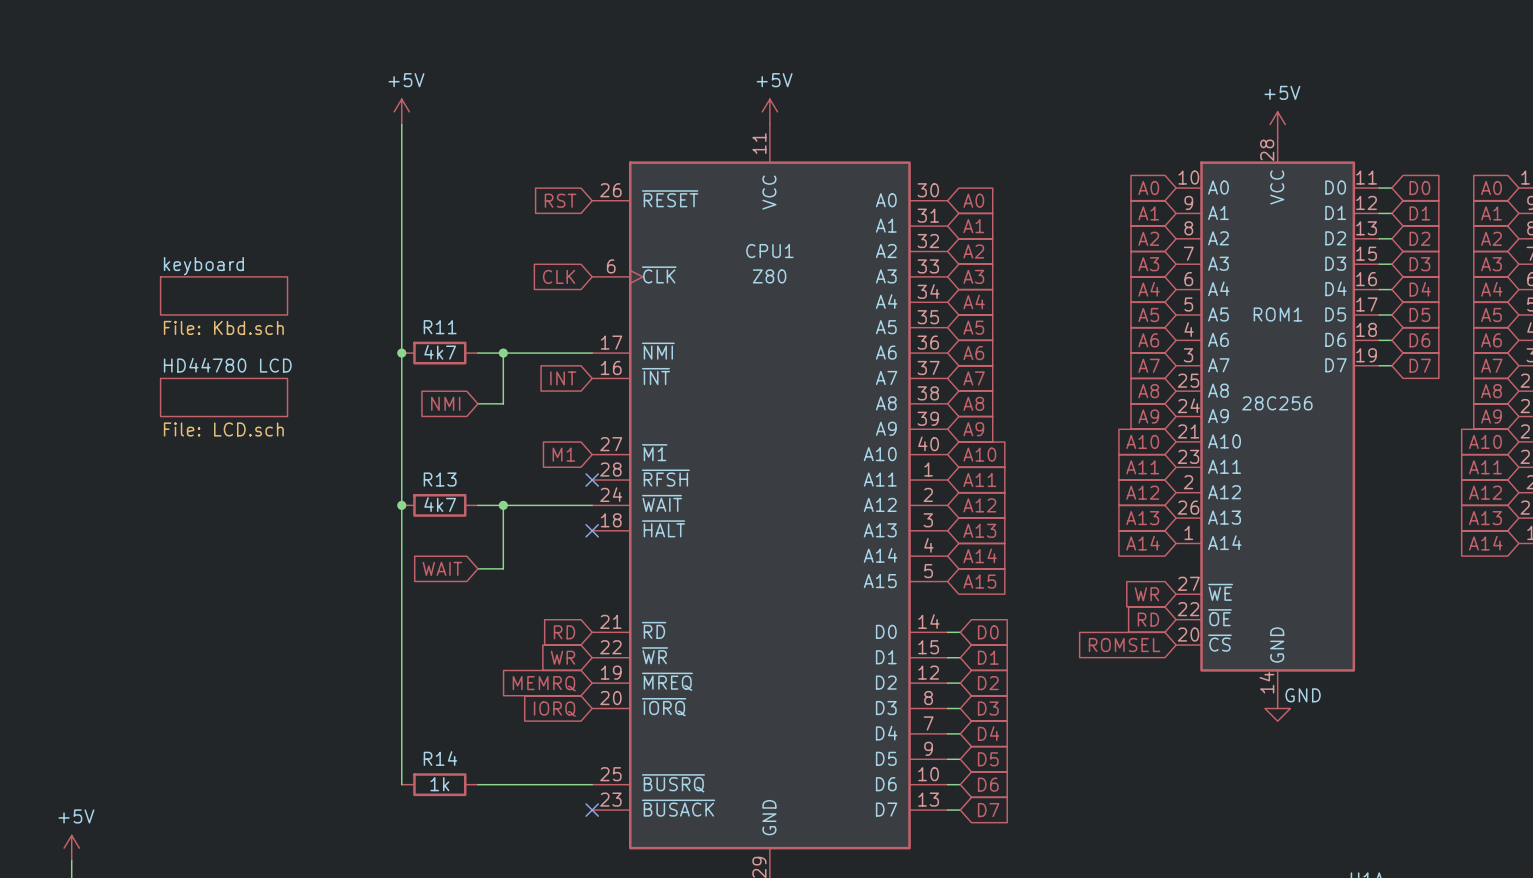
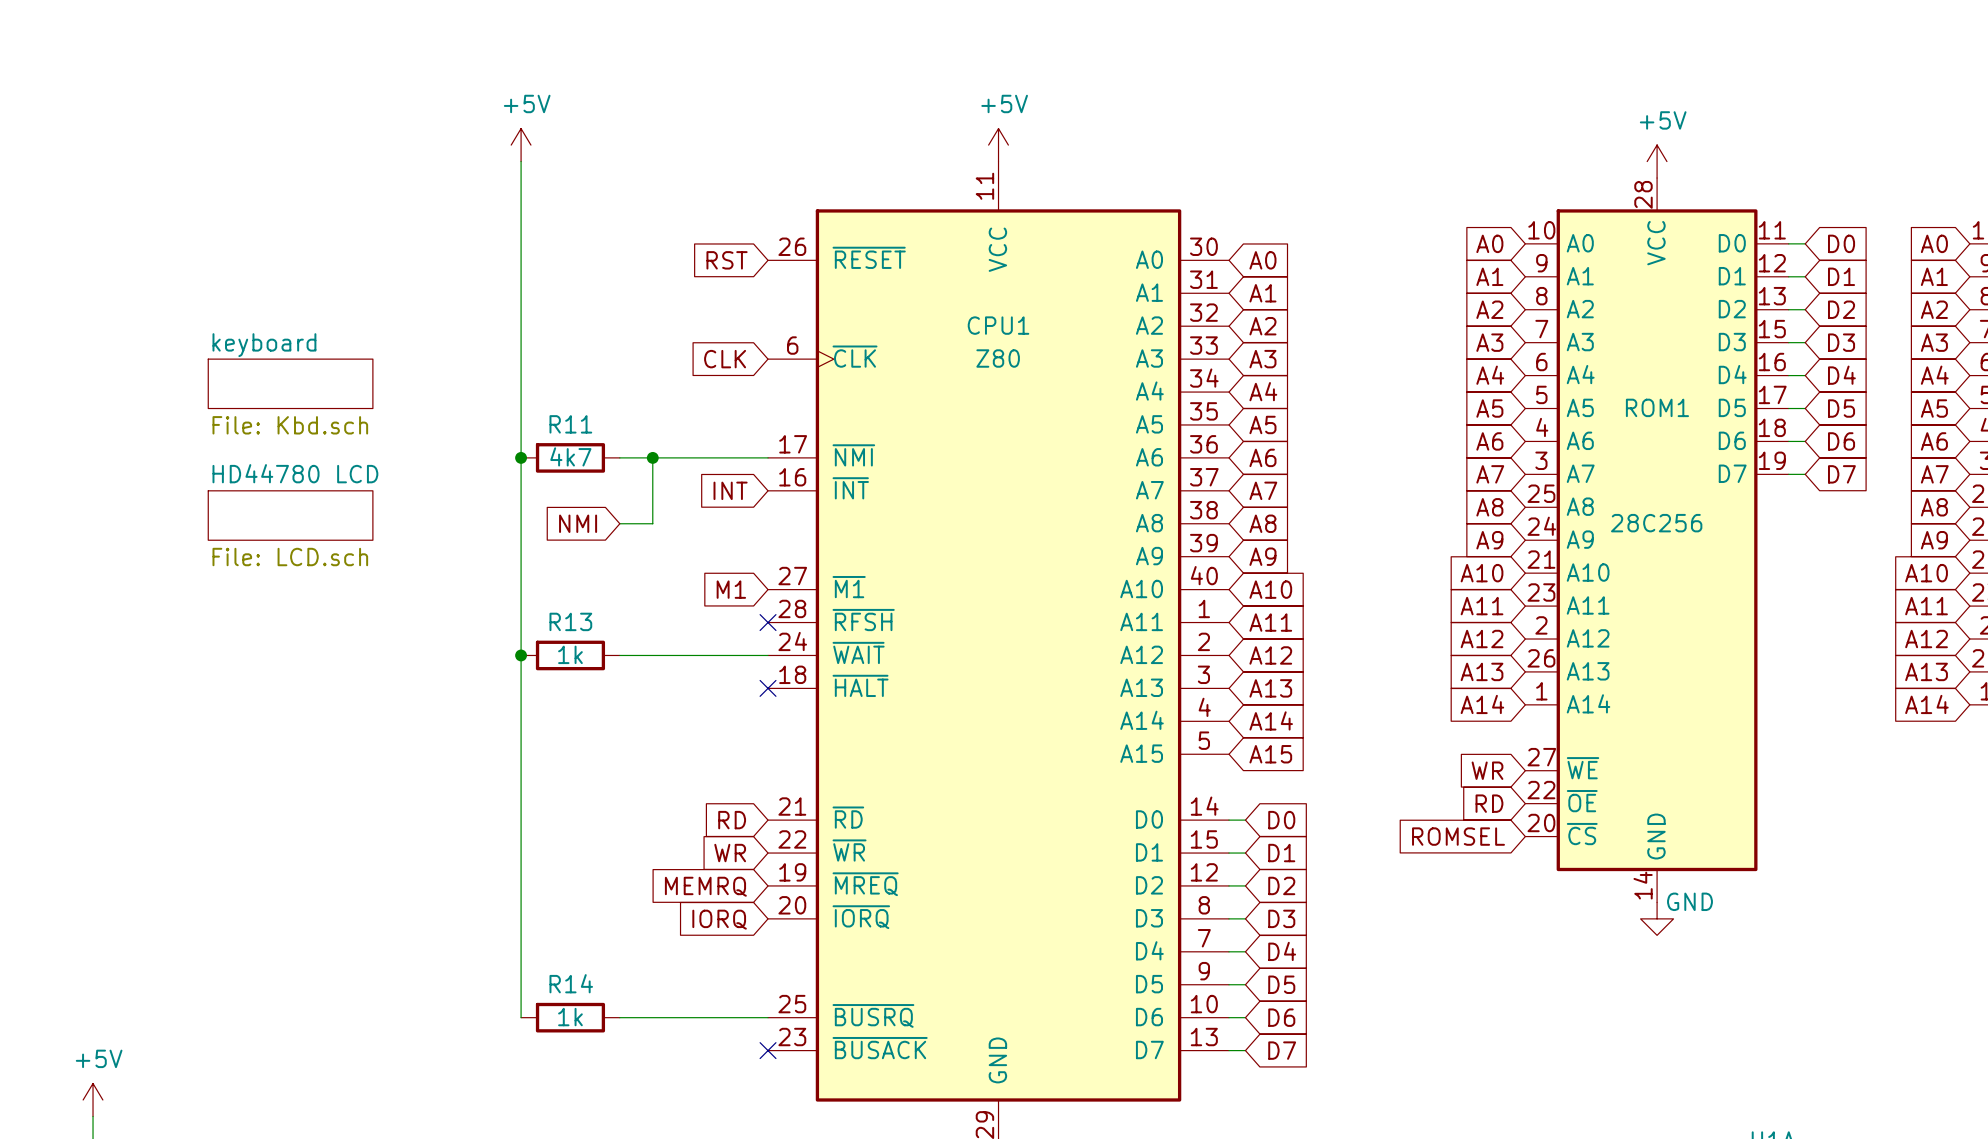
R13 value: 4k7 (440, 504) -> 1k (570, 654)
wire: (503, 505) (503, 568) (477, 568) -> none
junction: (503, 505) -> none
global label: WAIT (442, 568) -> none

